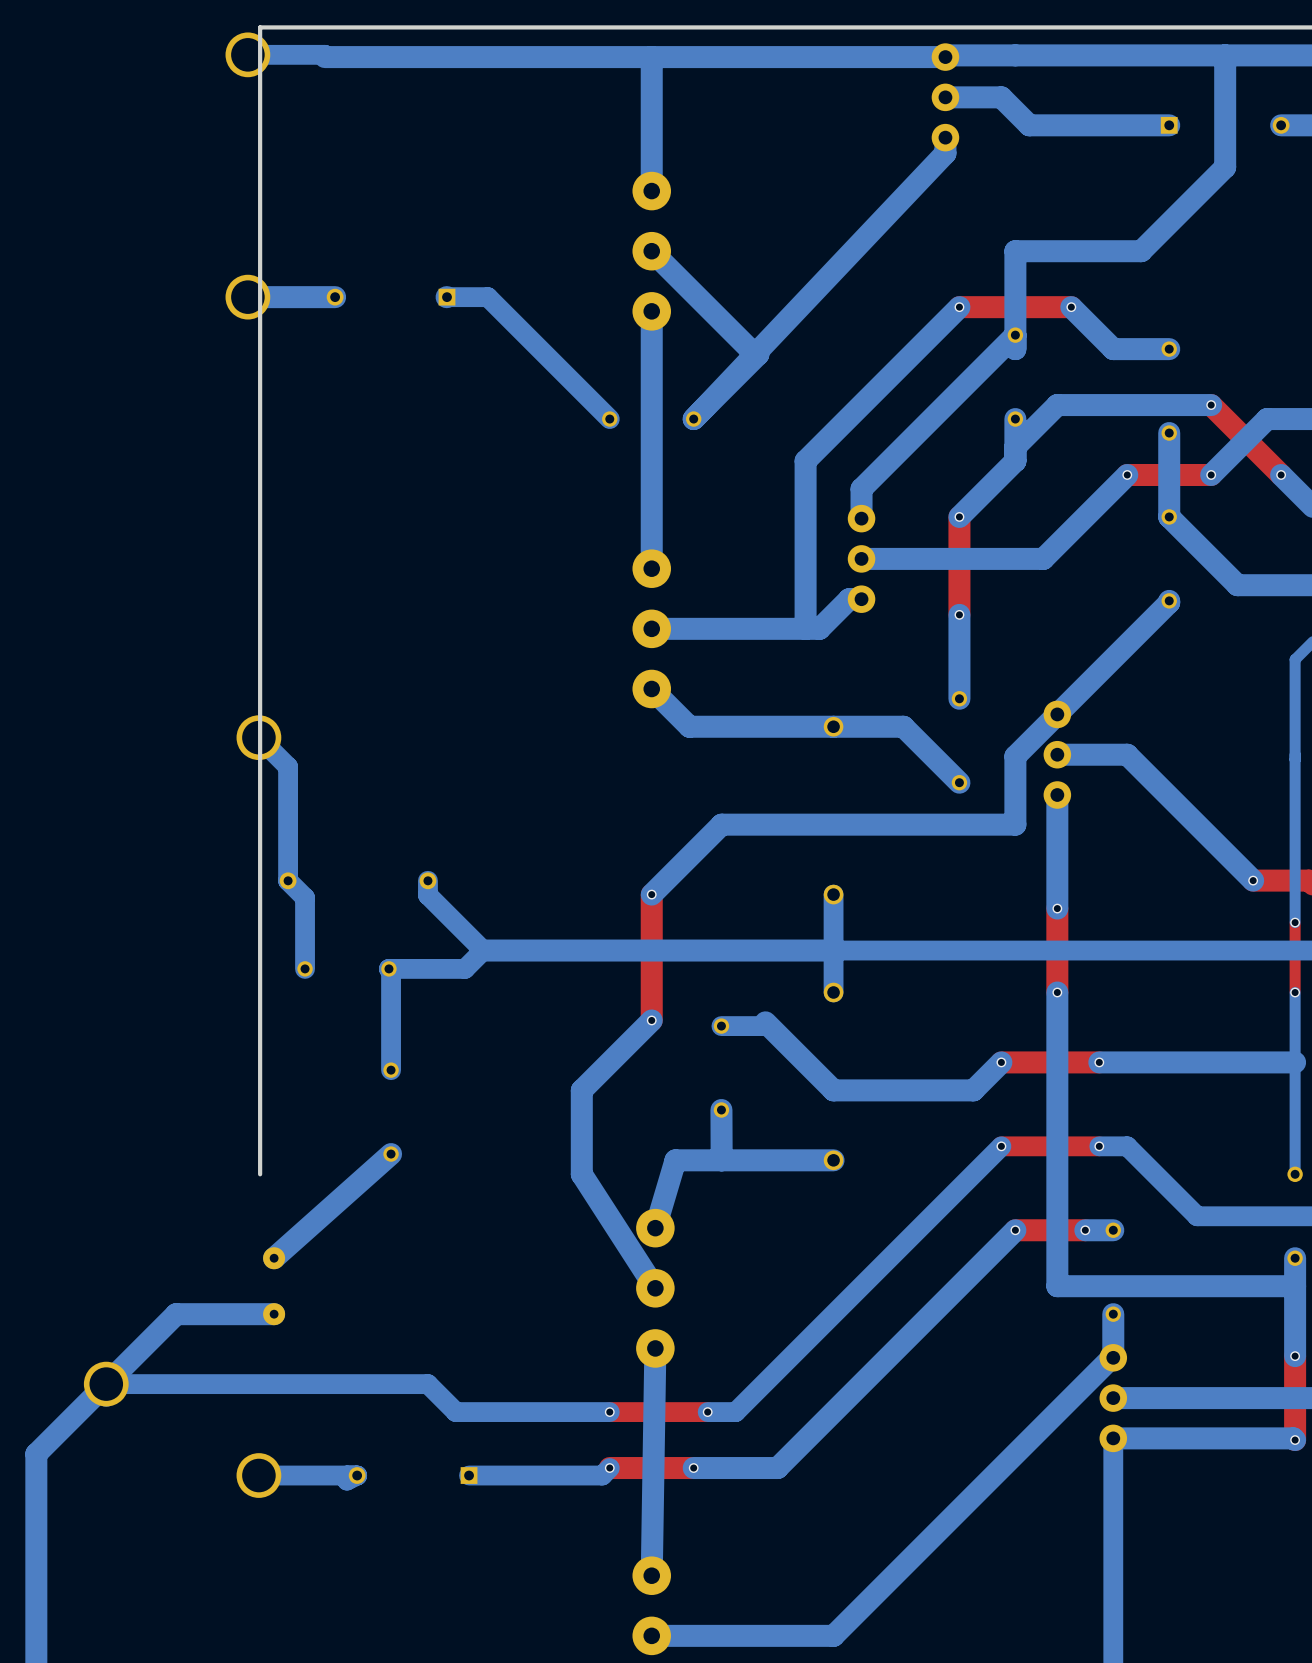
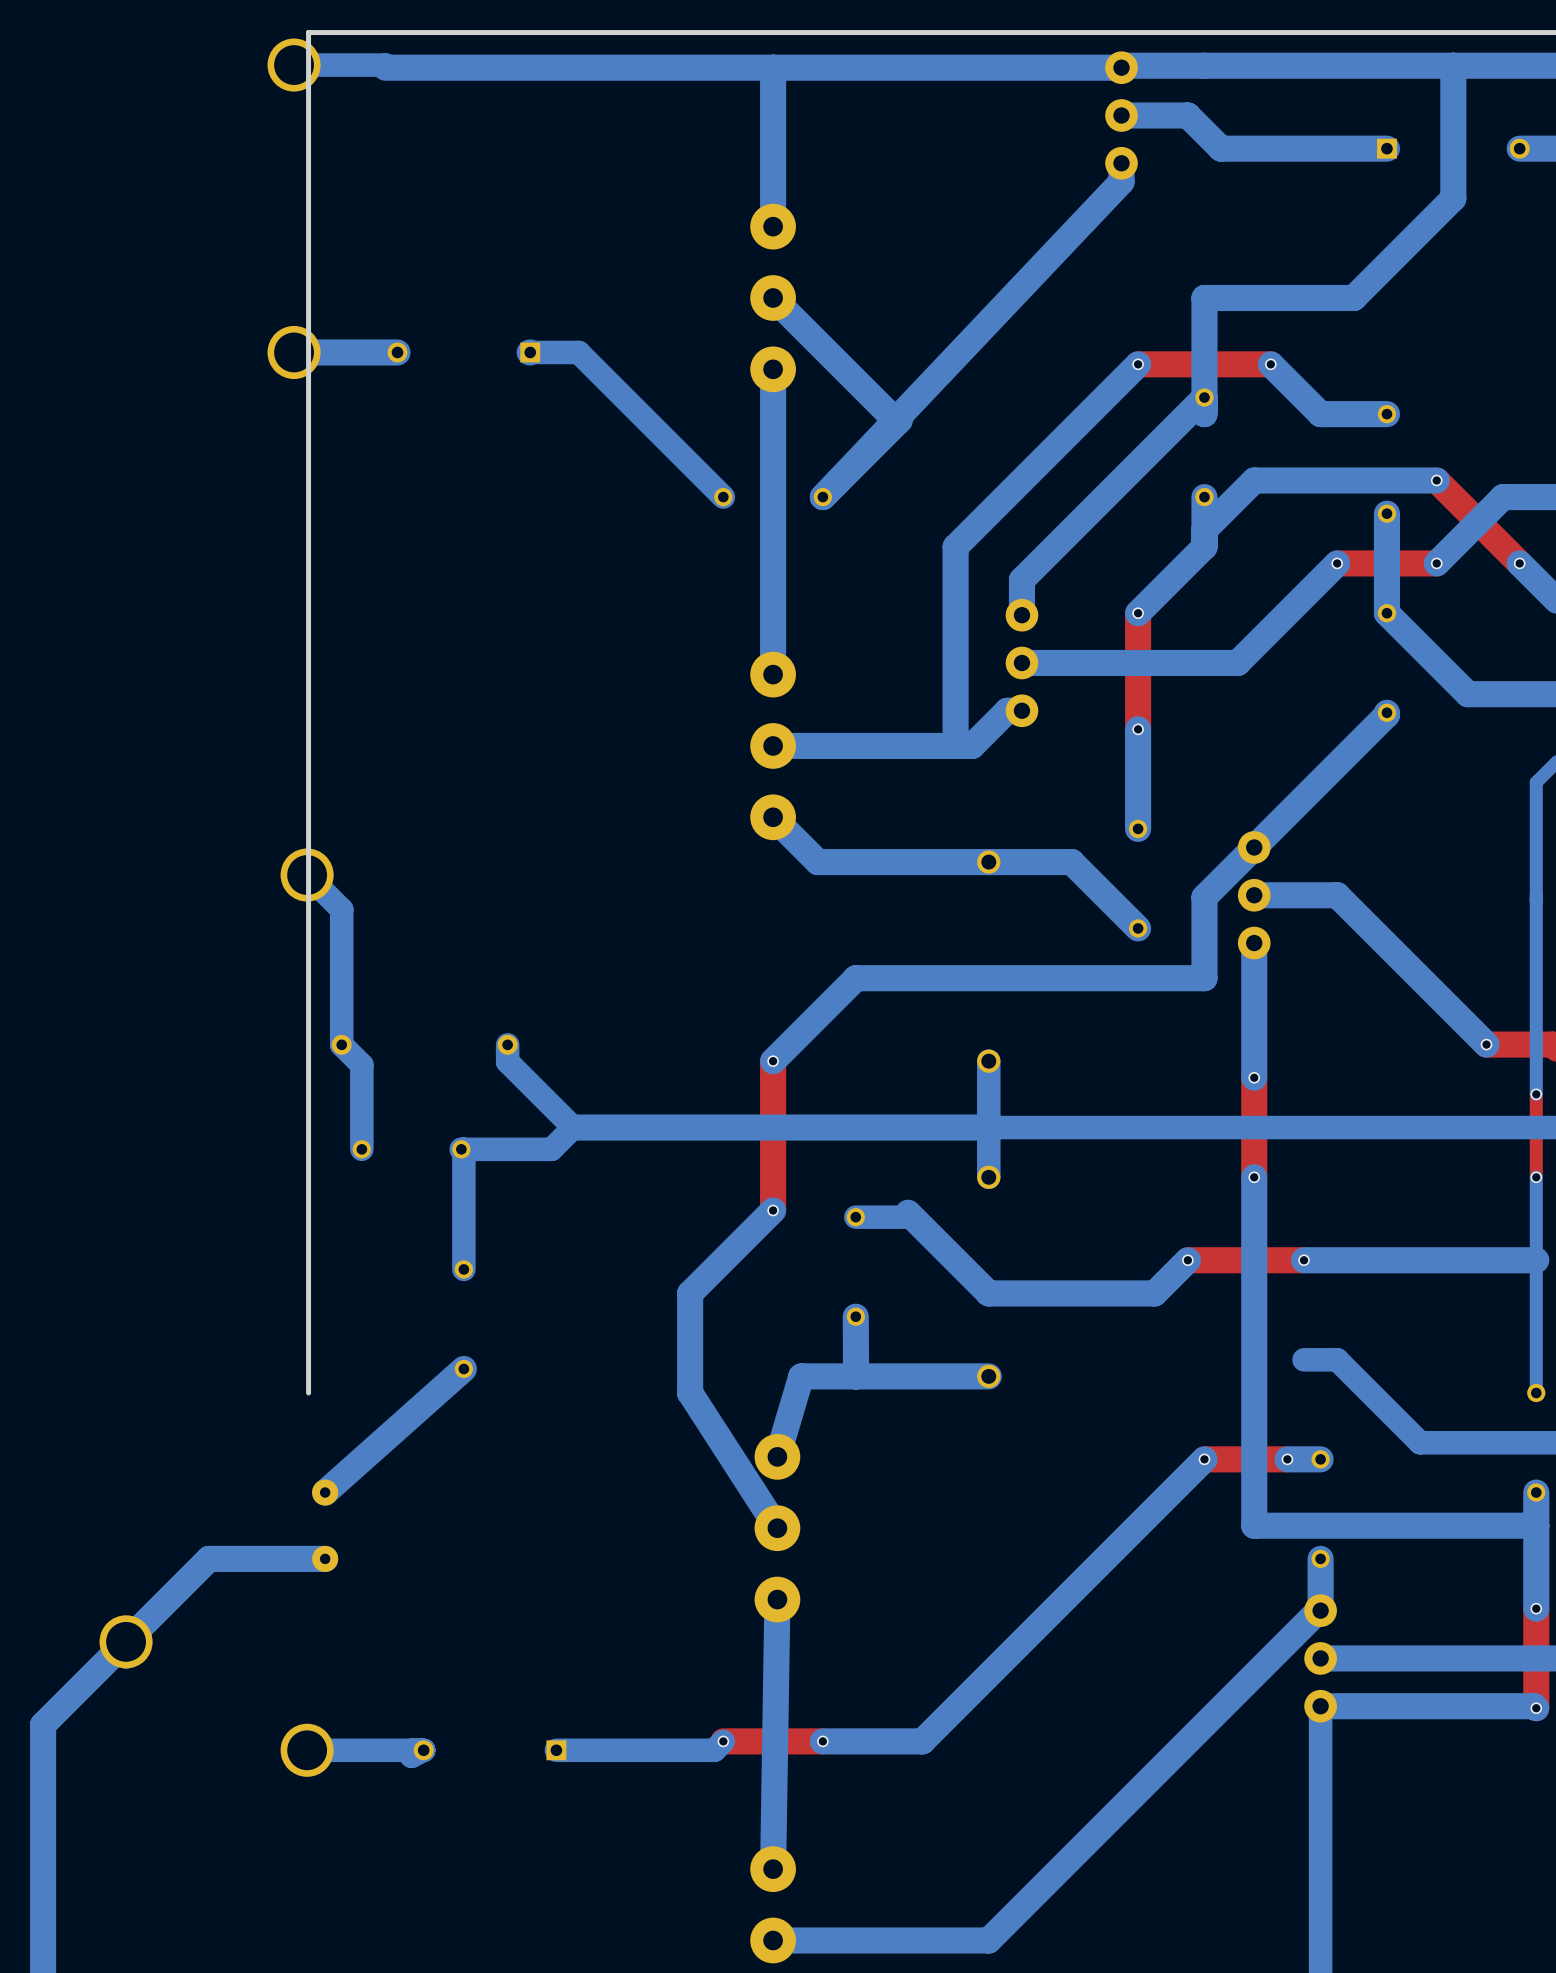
bottom track: (1001, 1146) (735, 1412) (707, 1412) -> none
via: (1001, 1146) -> none
top track: (1099, 1146) (1001, 1146) -> none
via: (1099, 1146) -> none
bottom track: (106, 1384) (427, 1384) (455, 1412) (609, 1412) -> none
via: (609, 1412) -> none
top track: (707, 1412) (609, 1412) -> none
via: (707, 1412) -> none

